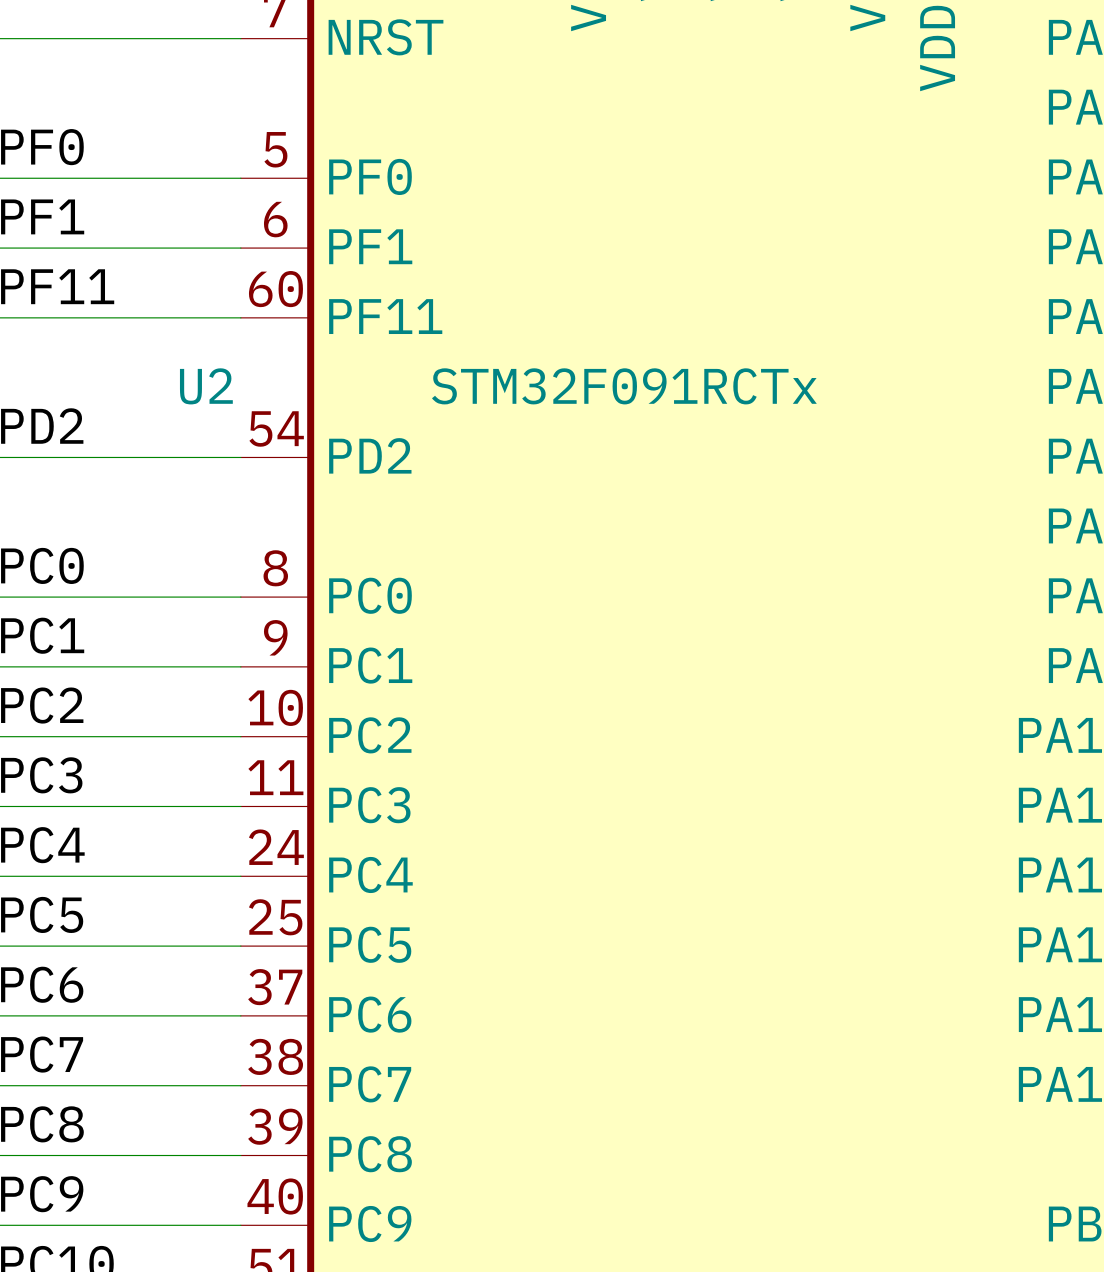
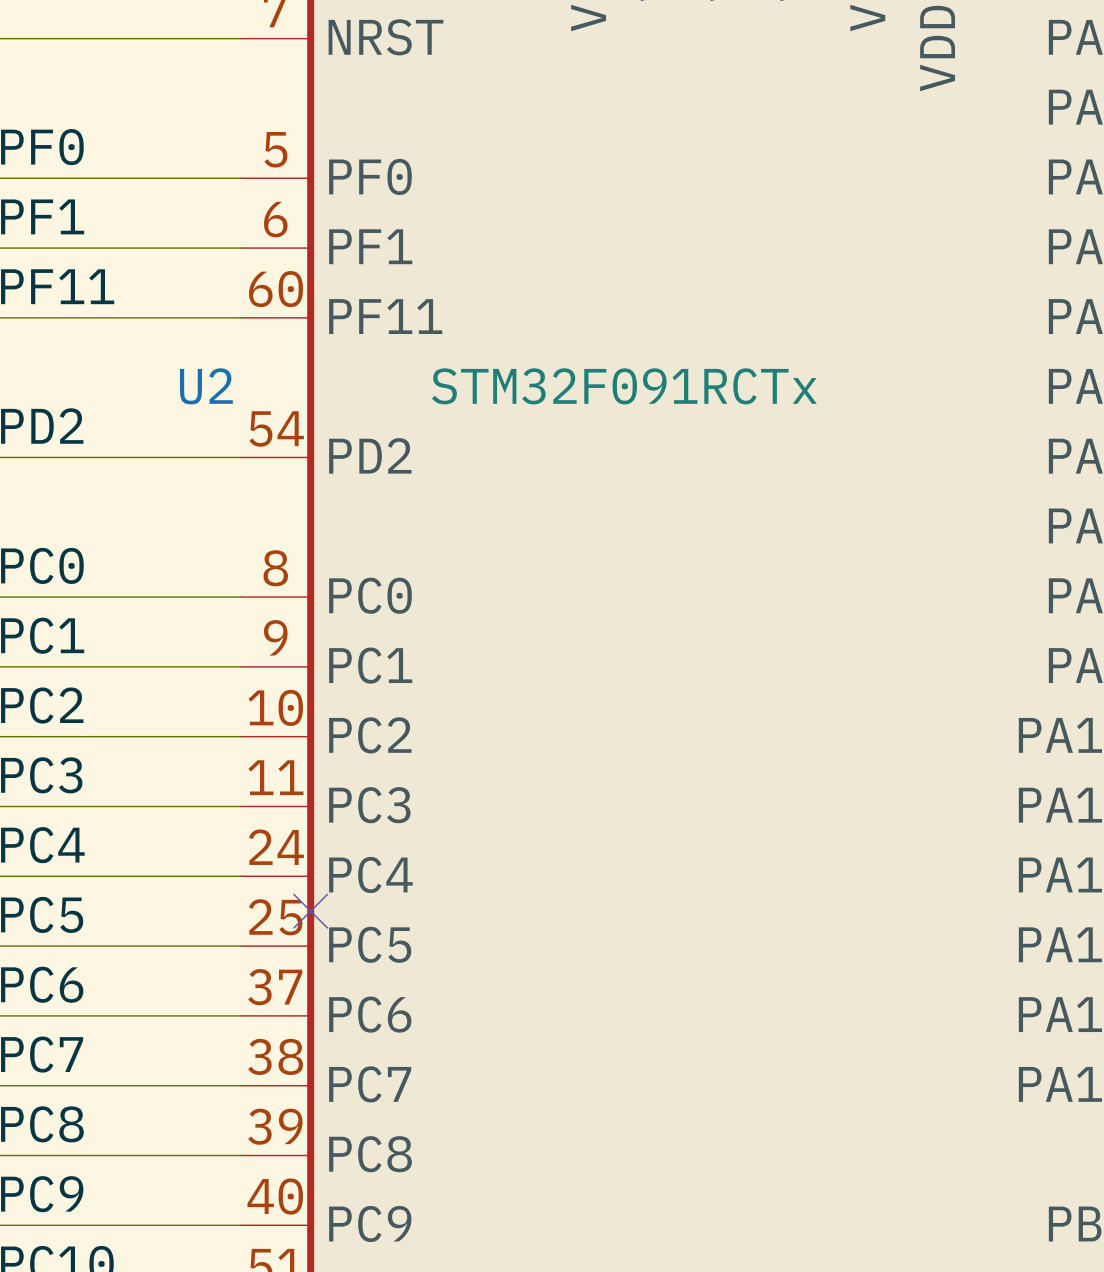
no-connect mark: none -> (310, 911)

